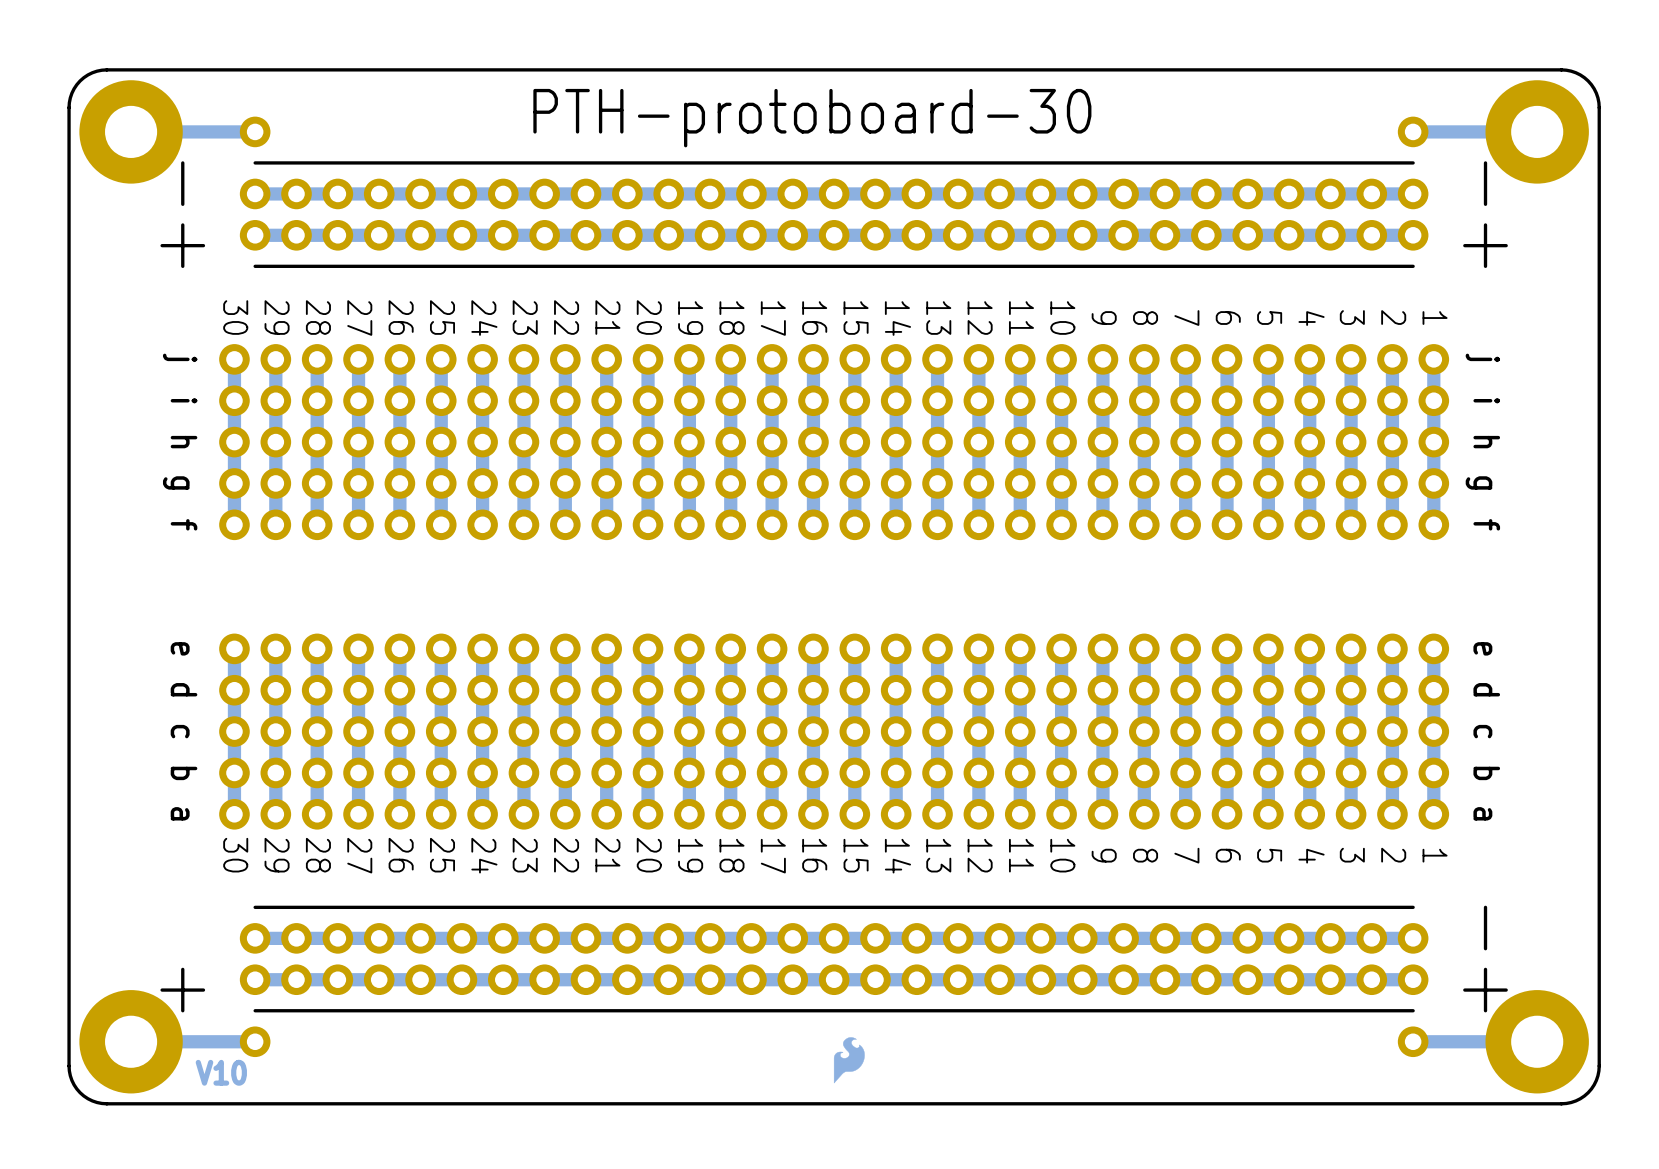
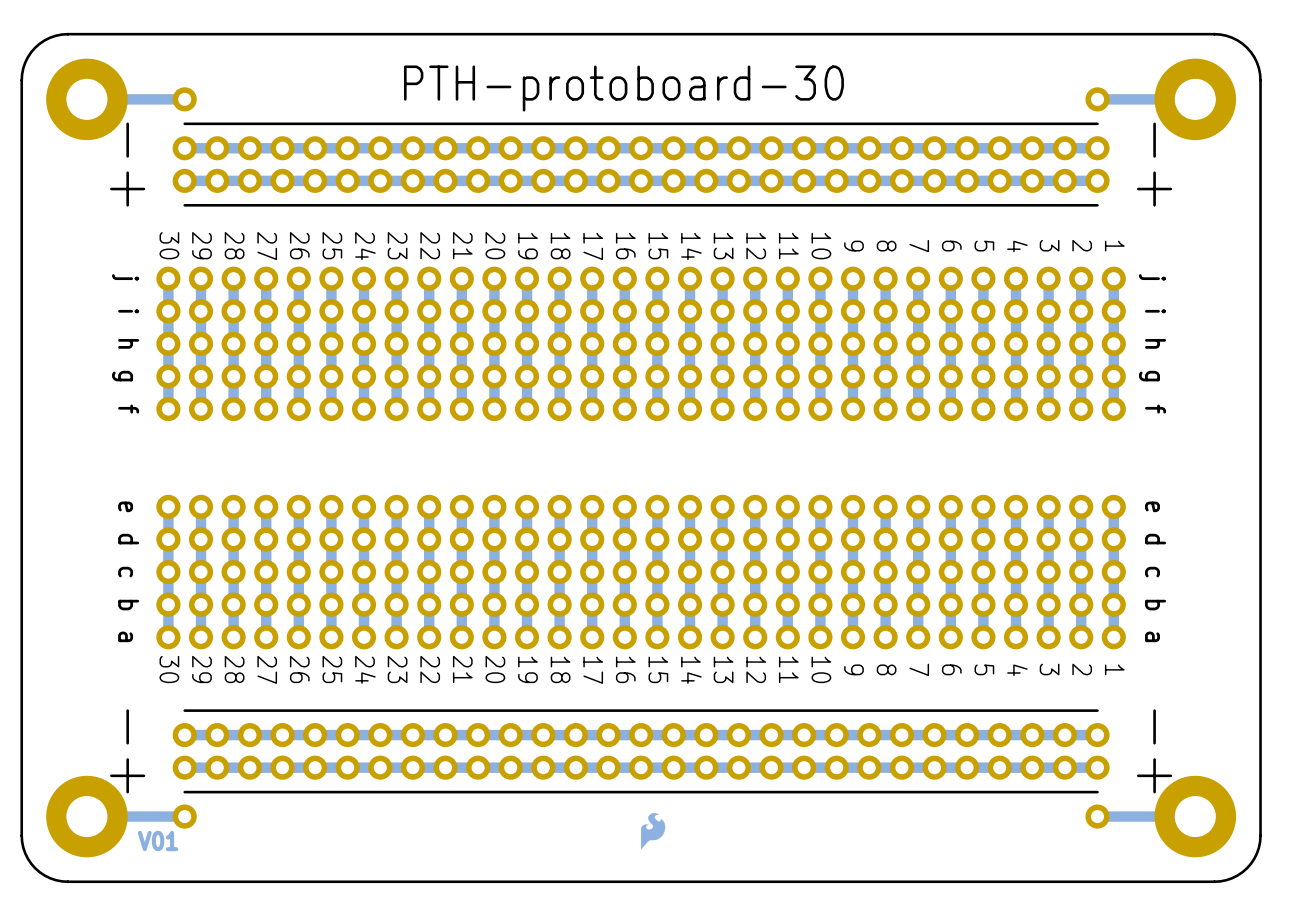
board edge: (1561, 69) (106, 69) (97, 71) (83, 77) (74, 88) (69, 107) (69, 1065) (70, 1075) (76, 1089) (87, 1098) (106, 1103) (1561, 1103) (1571, 1102) (1584, 1095) (1594, 1084) (1599, 1065) (1599, 107) (1596, 93) (1588, 80) (1575, 72) (1561, 69) -> (1214, 34) (1232, 37) (1247, 47) (1257, 62) (1260, 80) (1260, 835) (1257, 853) (1250, 863) (1242, 872) (1232, 878) (1214, 881) (67, 881) (50, 878) (39, 872) (31, 863) (25, 853) (21, 835) (21, 80) (25, 62) (31, 52) (39, 43) (50, 37) (67, 34) (1214, 34)
line: none -> (127, 710) (127, 743)
text: V10 (221, 1072) -> V01 (158, 841)

